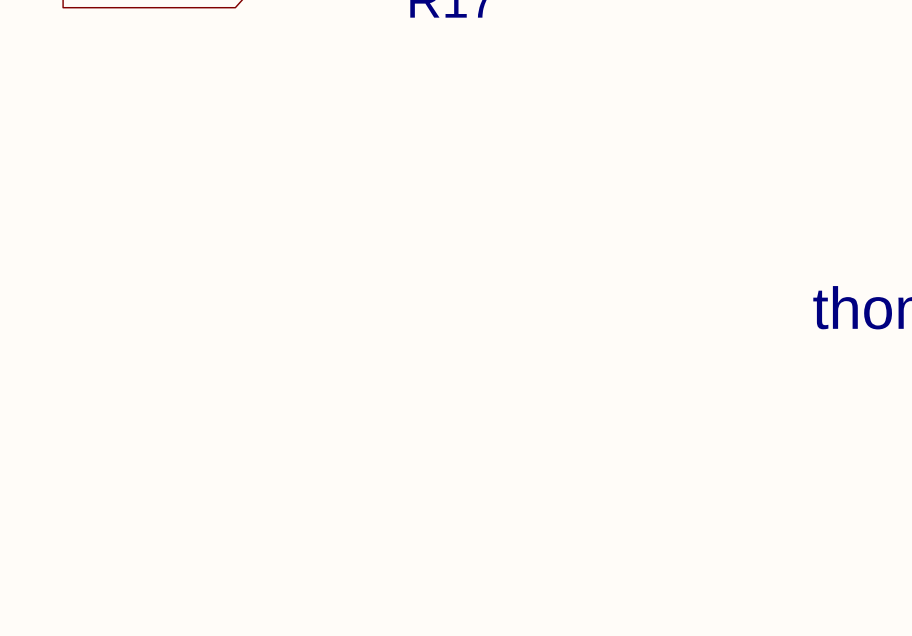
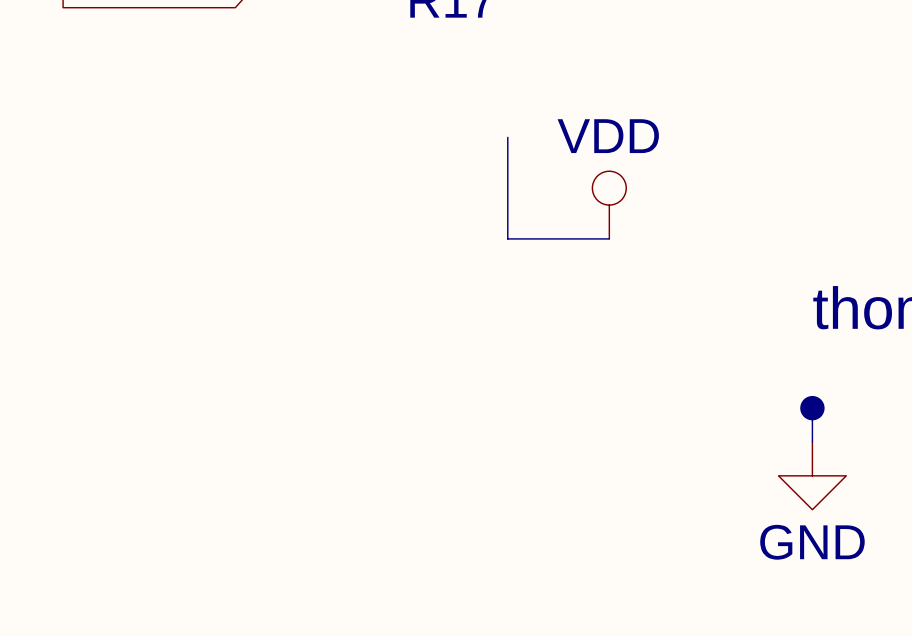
wire: none -> (507, 137) (507, 238) (609, 238)
power symbol: none -> VDD (609, 205)
wire: none -> (812, 408) (812, 442)
junction: none -> (812, 408)
power symbol: none -> GND (812, 475)

